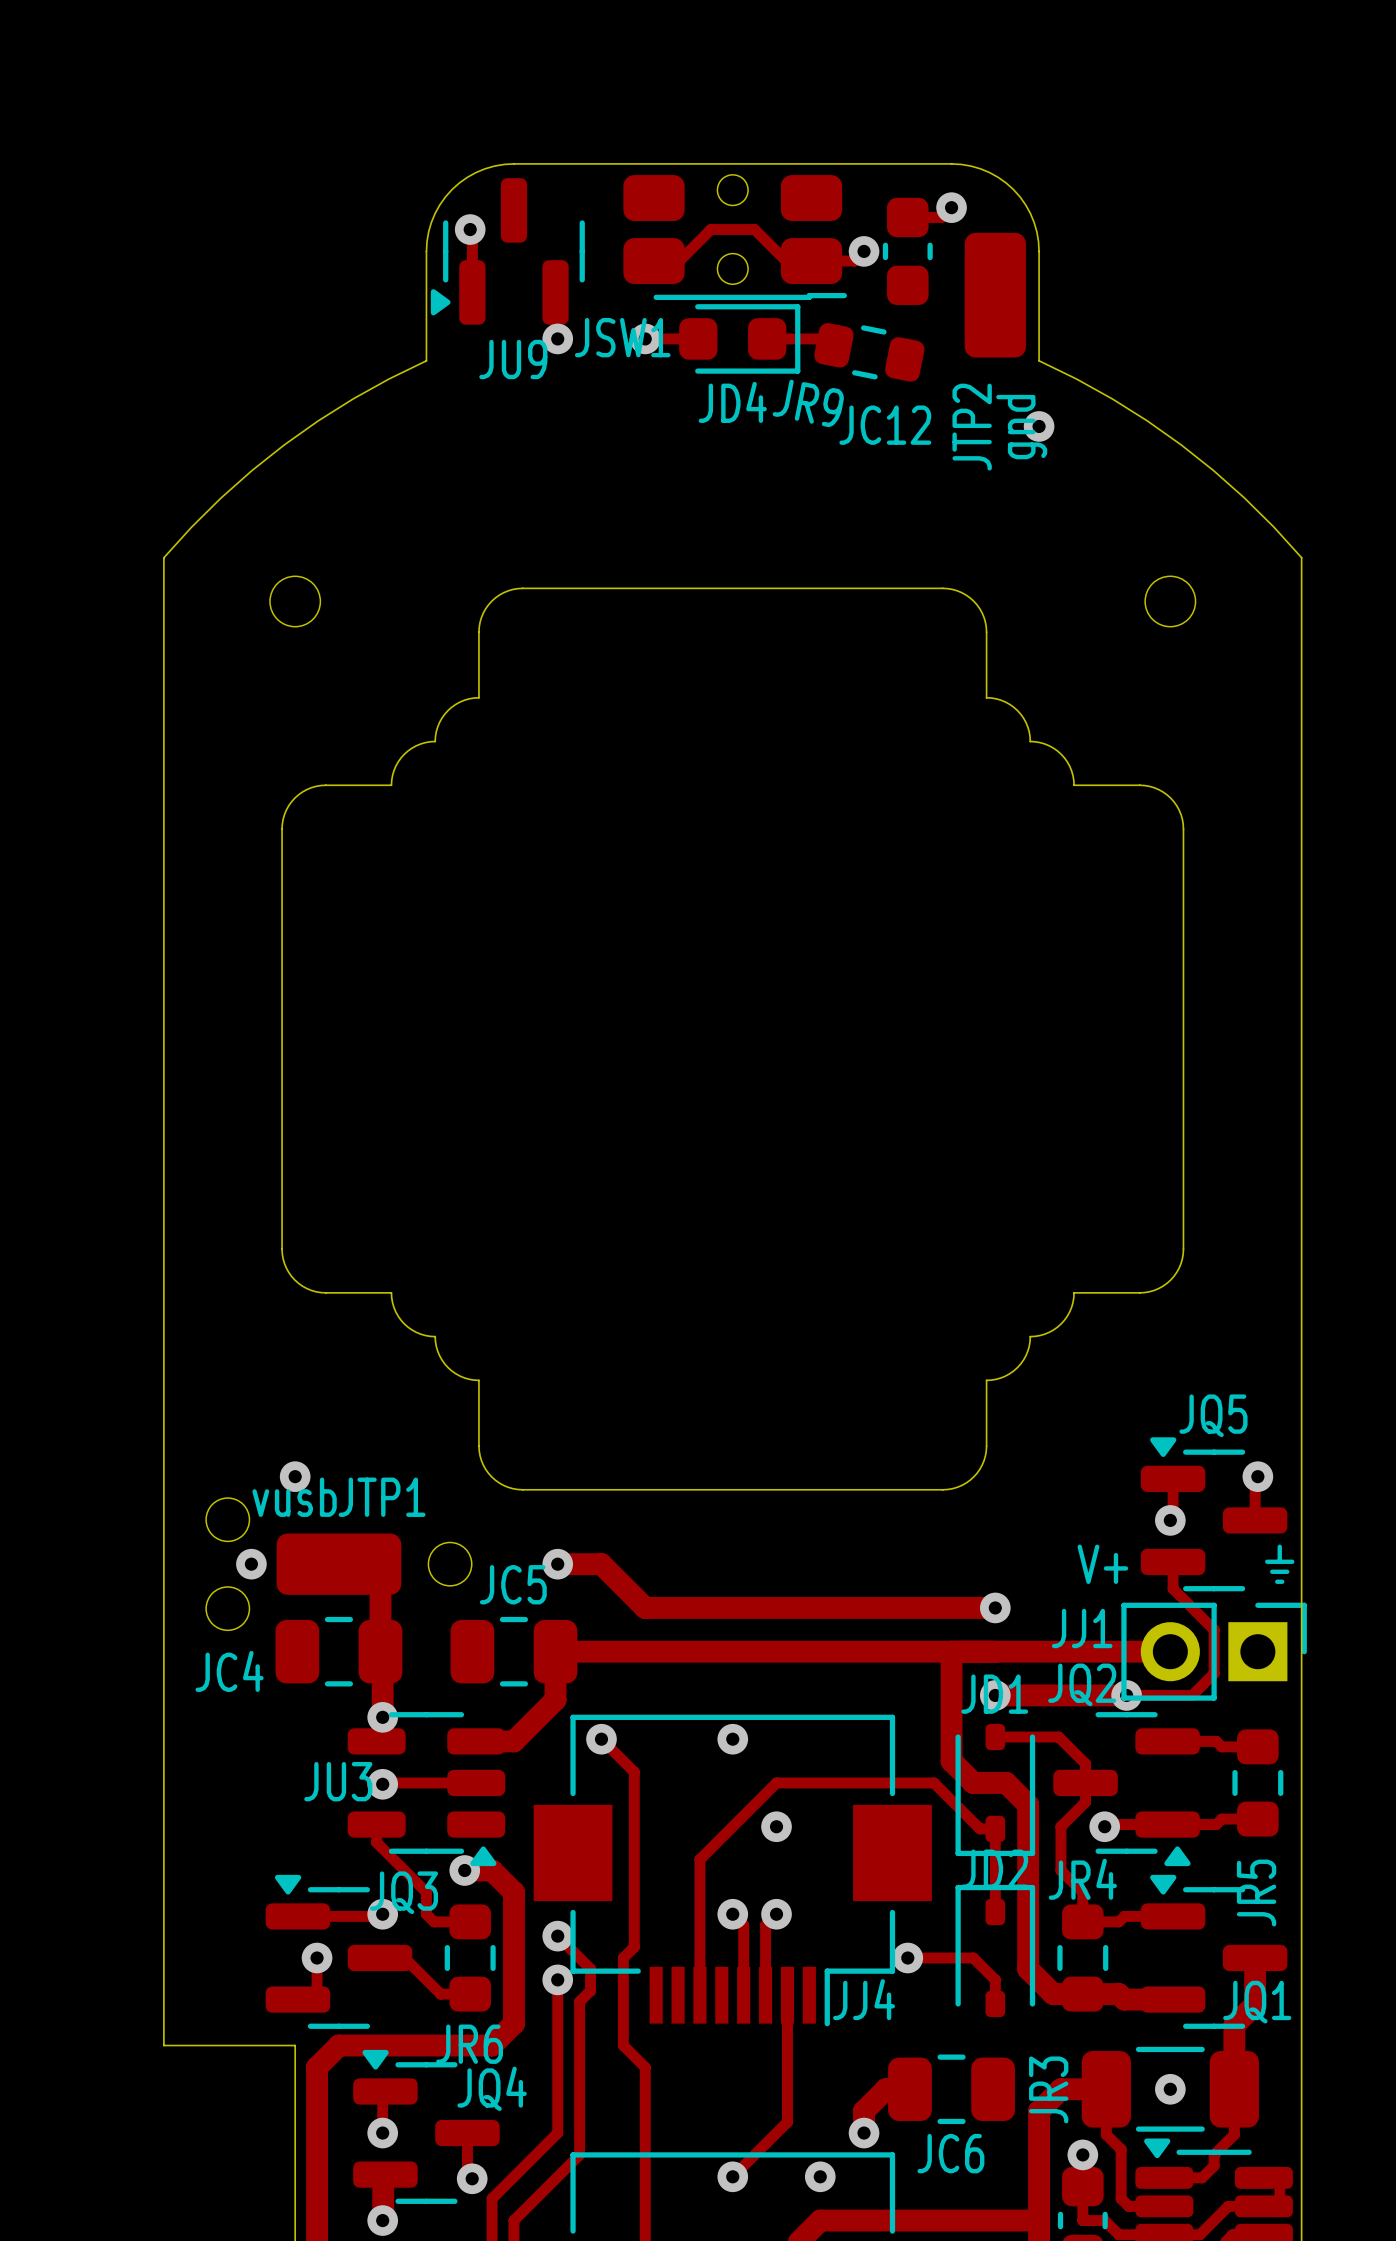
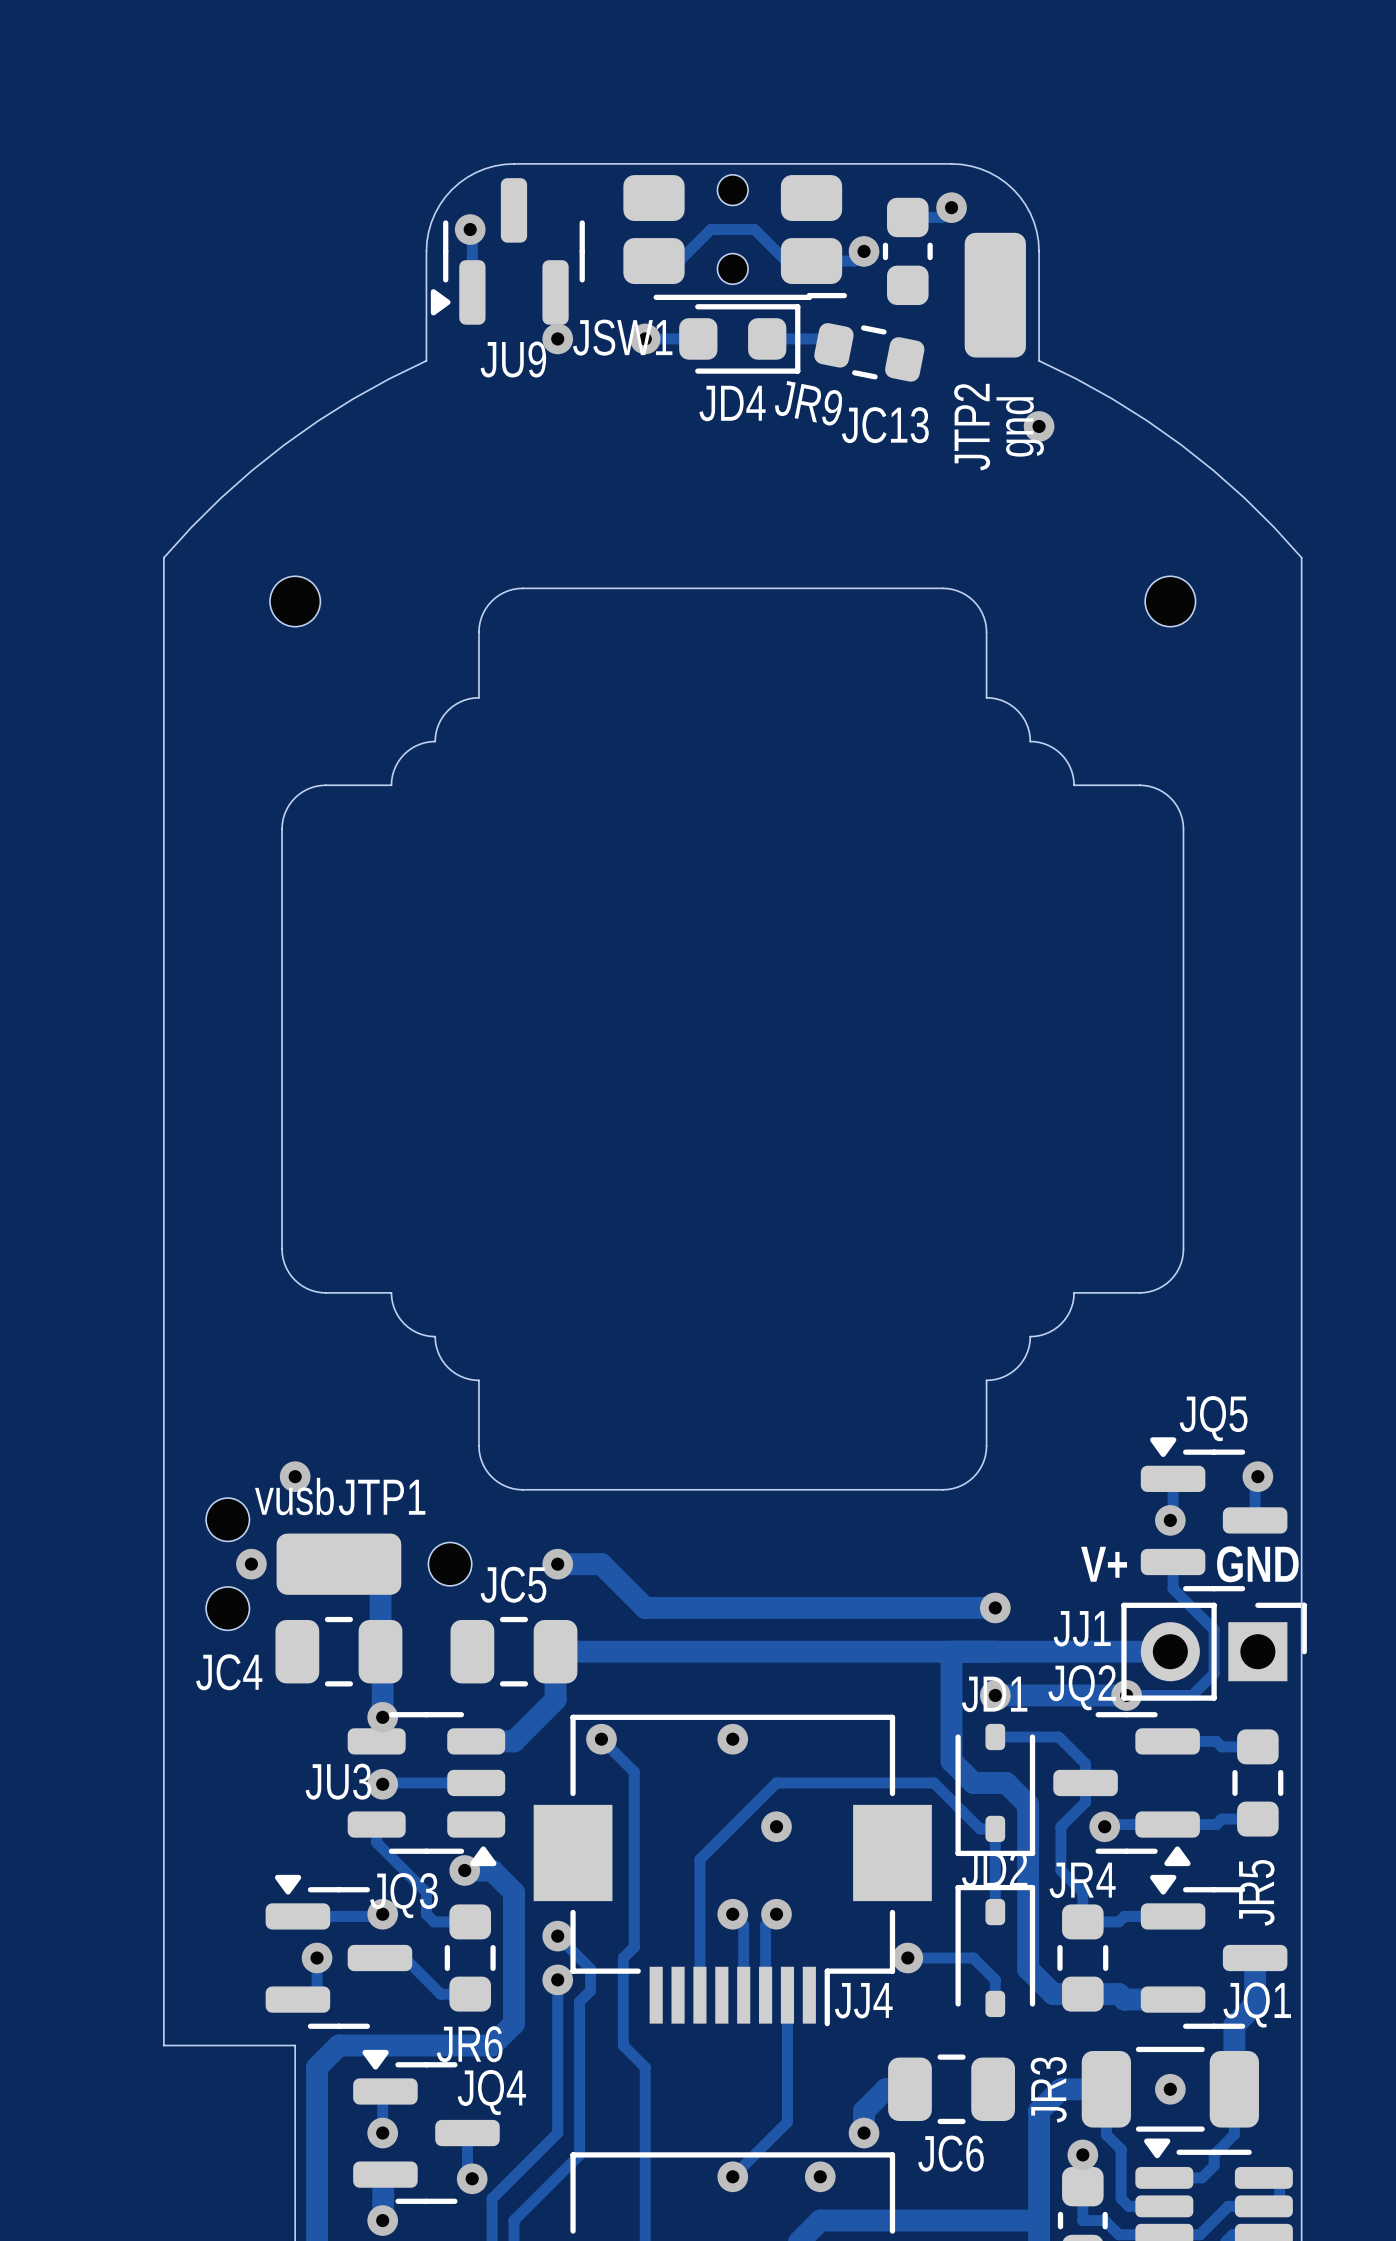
JC12 name: JC12 (885, 425) -> JC13 (885, 425)
text: ⏚ (1279, 1564) -> GND (1257, 1564)

